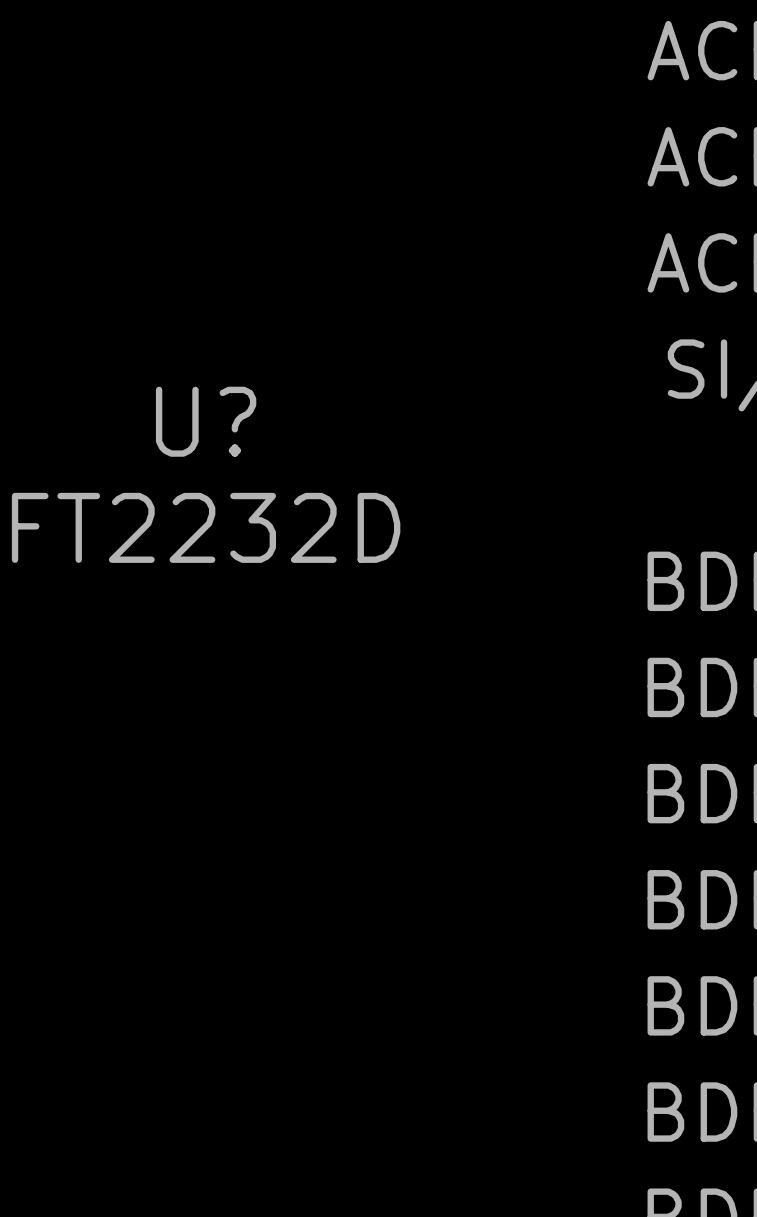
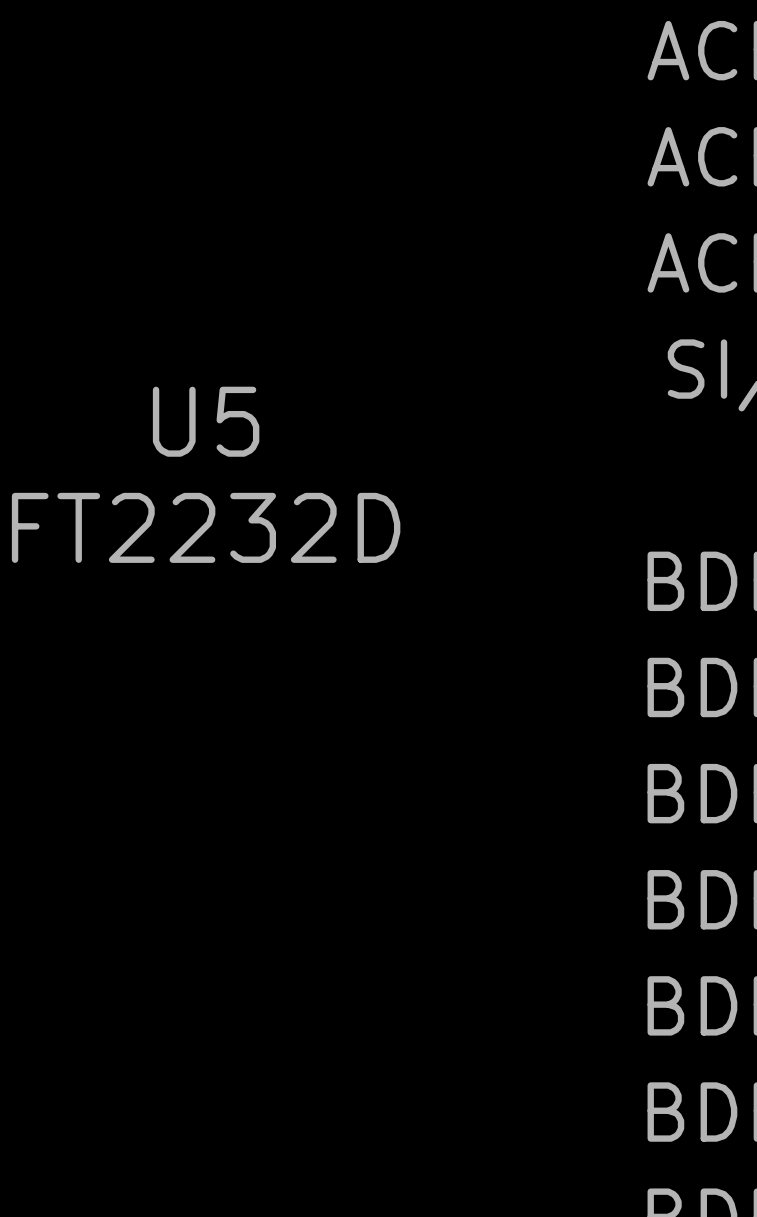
U? name: U? (206, 421) -> U5 (206, 421)

